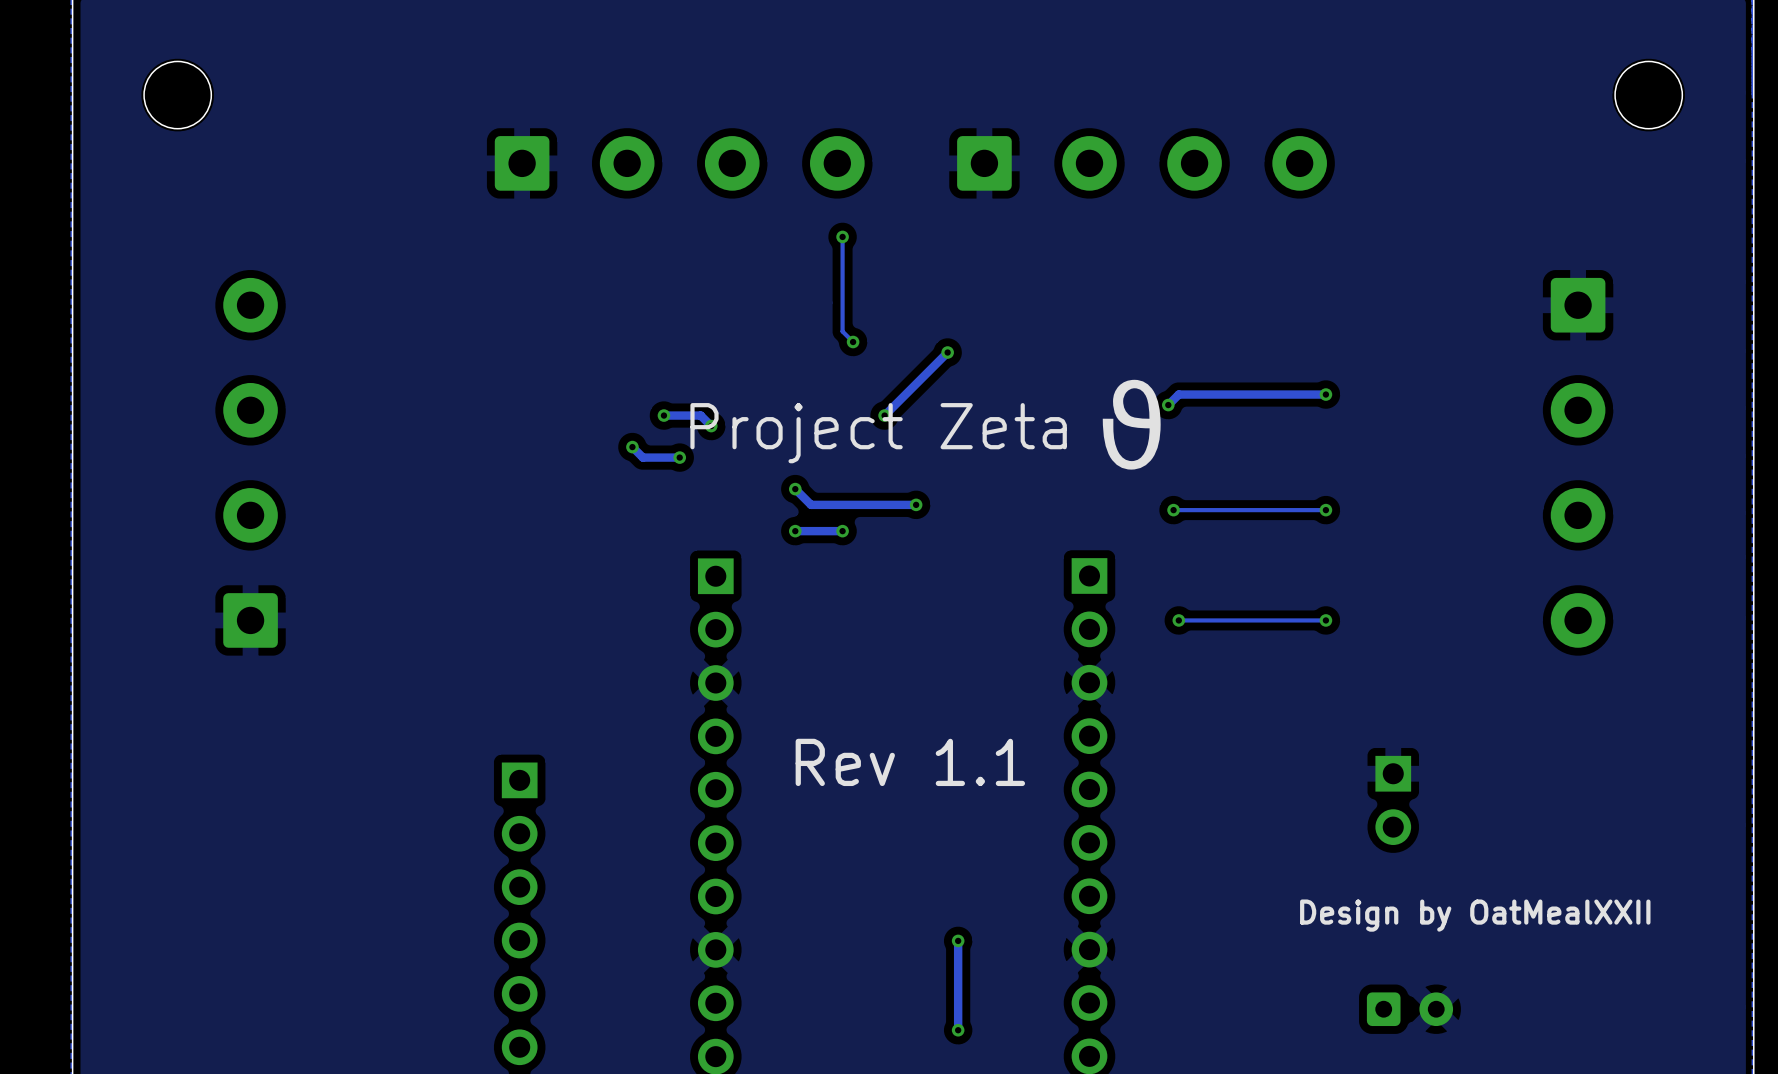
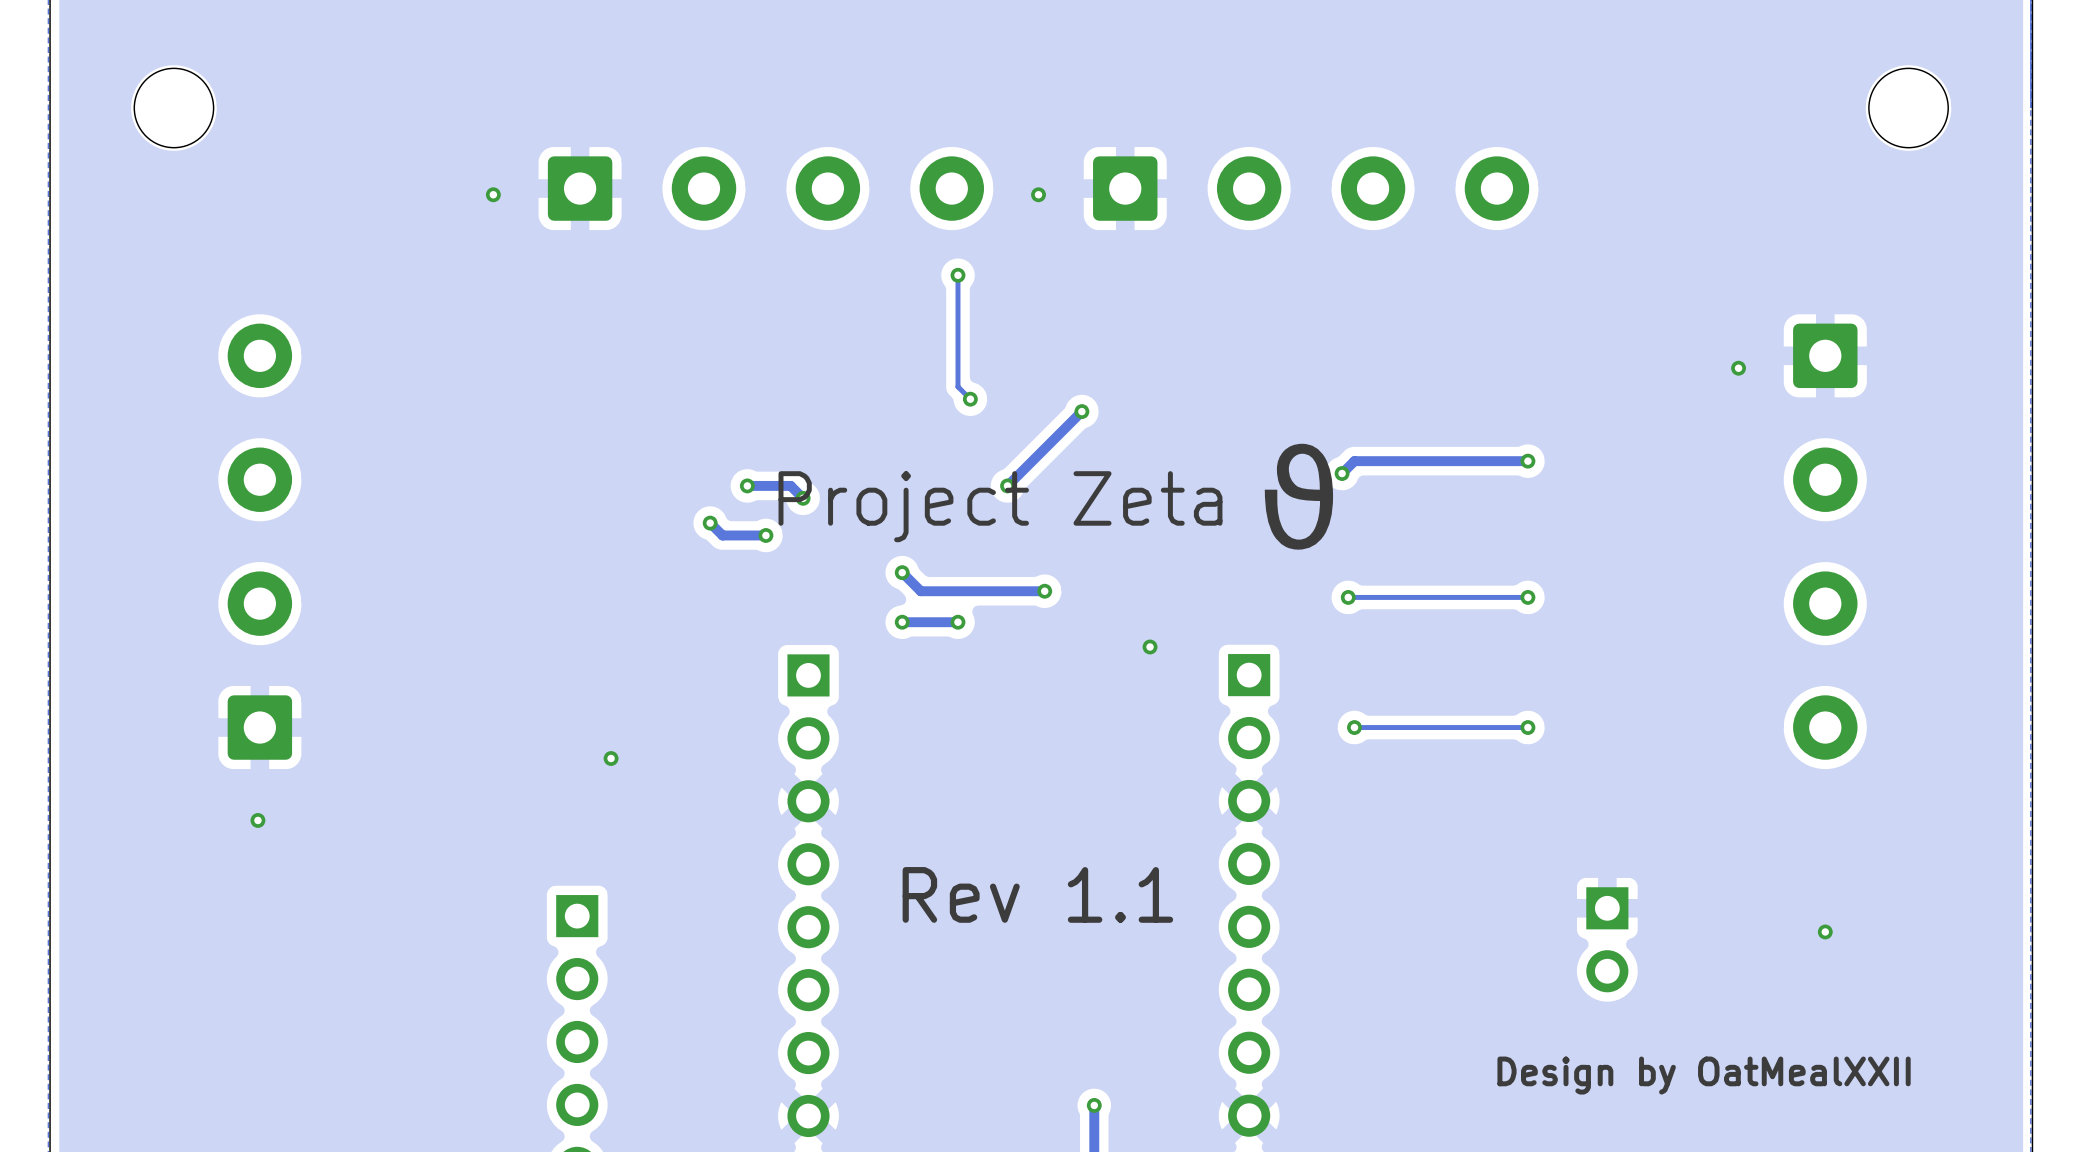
via: none -> (493, 194)
via: none -> (1038, 194)
via: none -> (1738, 368)
via: none -> (1150, 646)
via: none -> (611, 758)
via: none -> (257, 820)
via: none -> (1825, 931)

